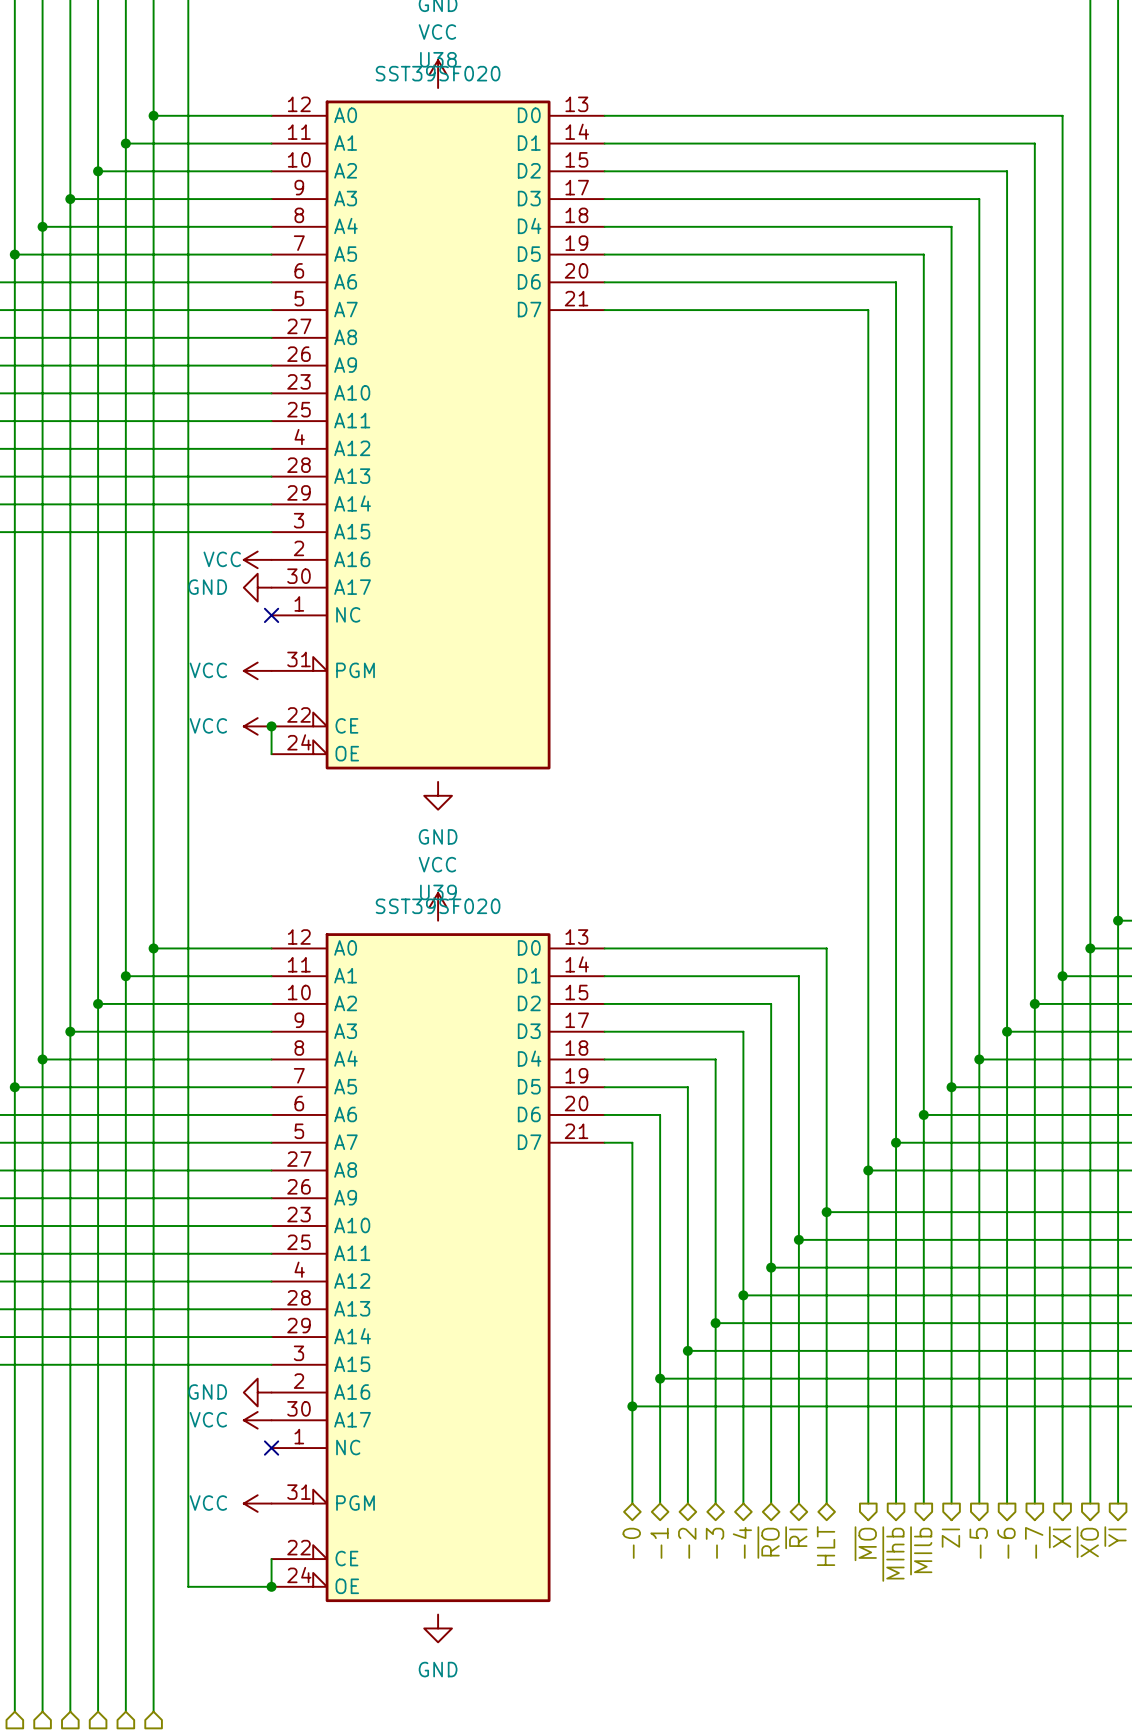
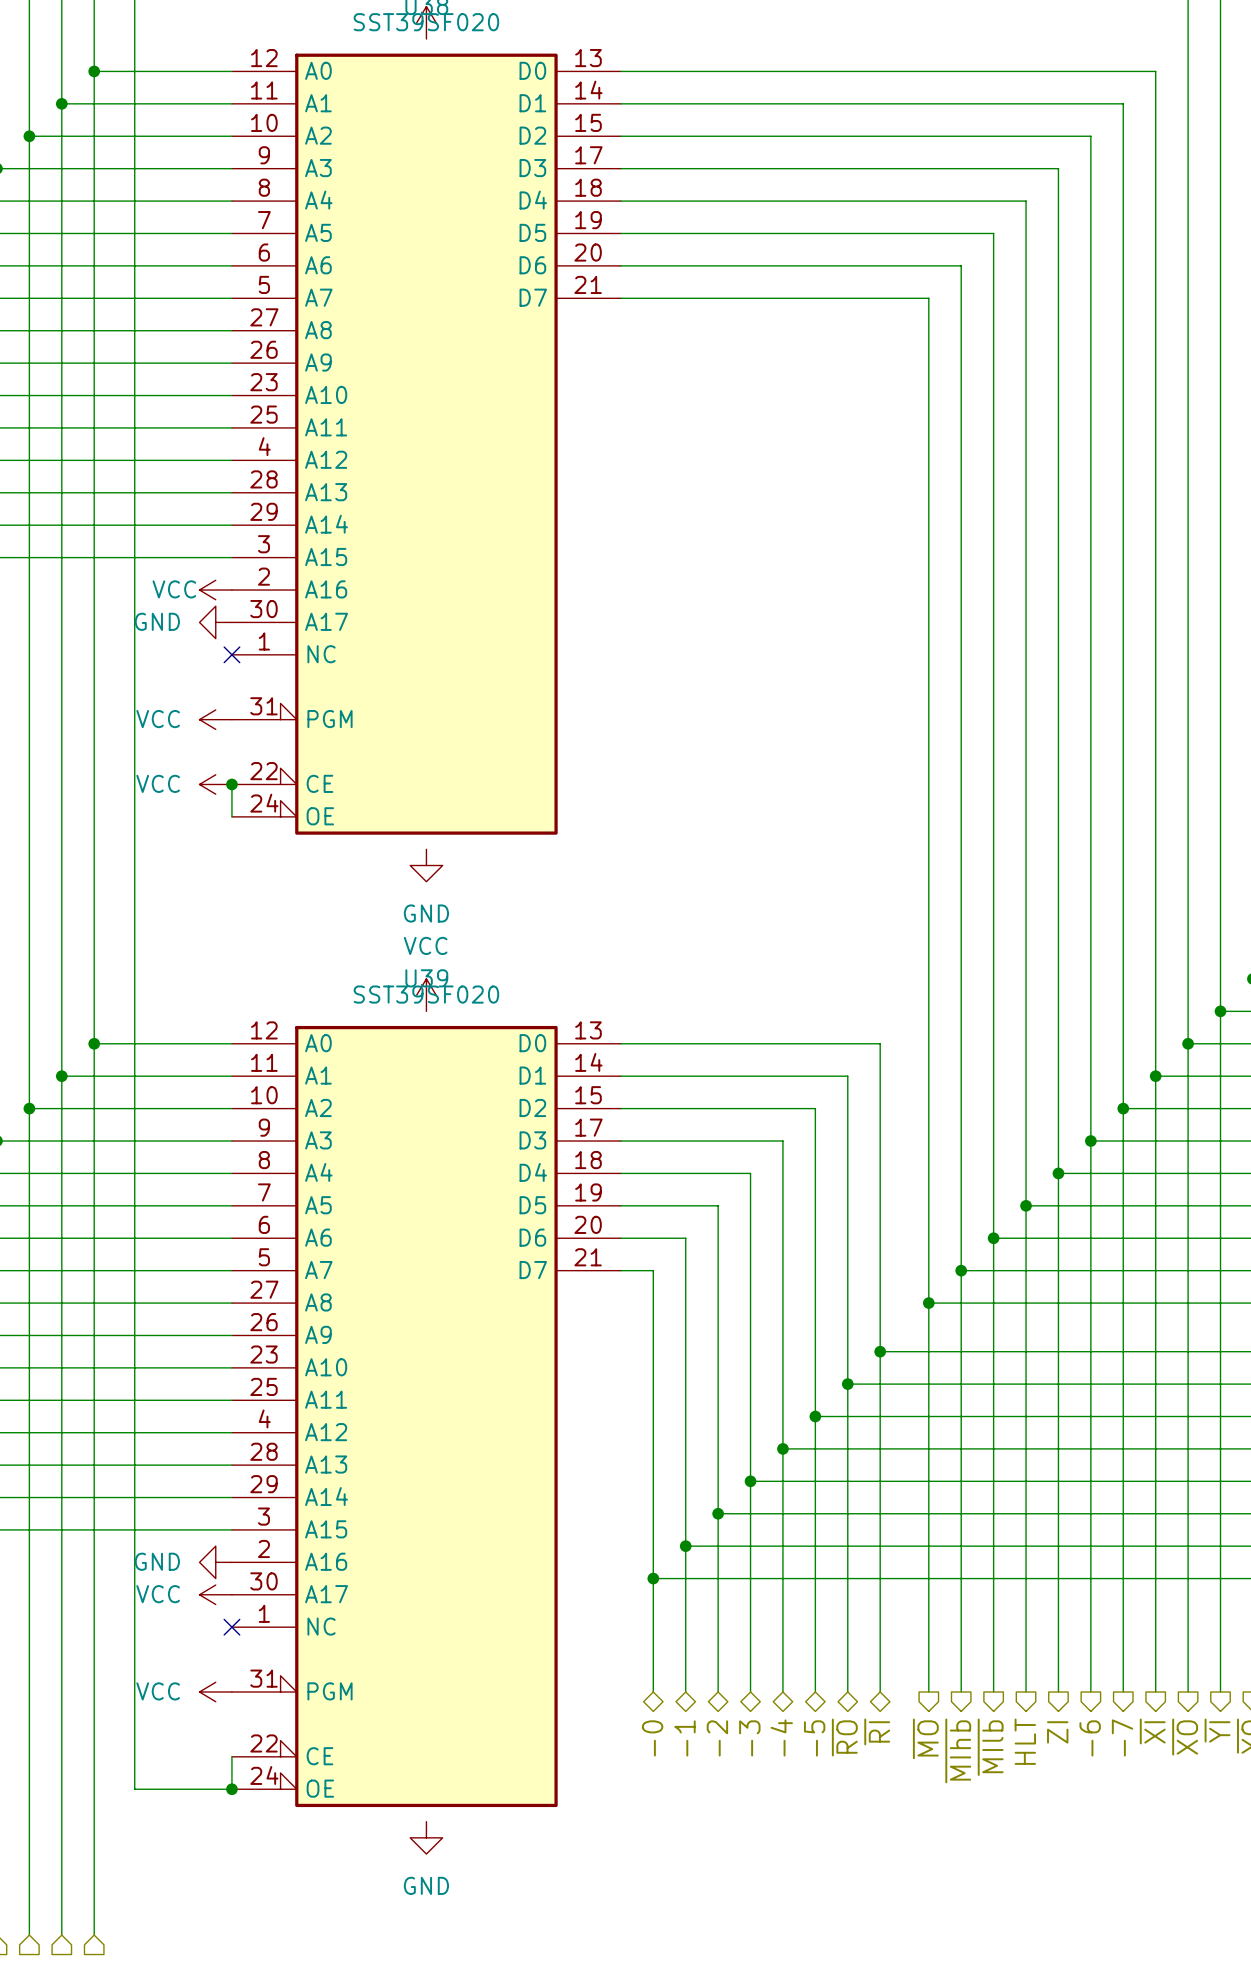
hierarchical label: ~{RI} (796, 1537) -> ~{RO} (844, 1737)
hierarchical label: ZI (950, 1538) -> HLT (1025, 1741)
hierarchical label: ~{RO} (768, 1542) -> -5 (814, 1738)
hierarchical label: -5 (978, 1543) -> ZI (1057, 1732)
hierarchical label: HLT (826, 1546) -> ~{RI} (877, 1731)

